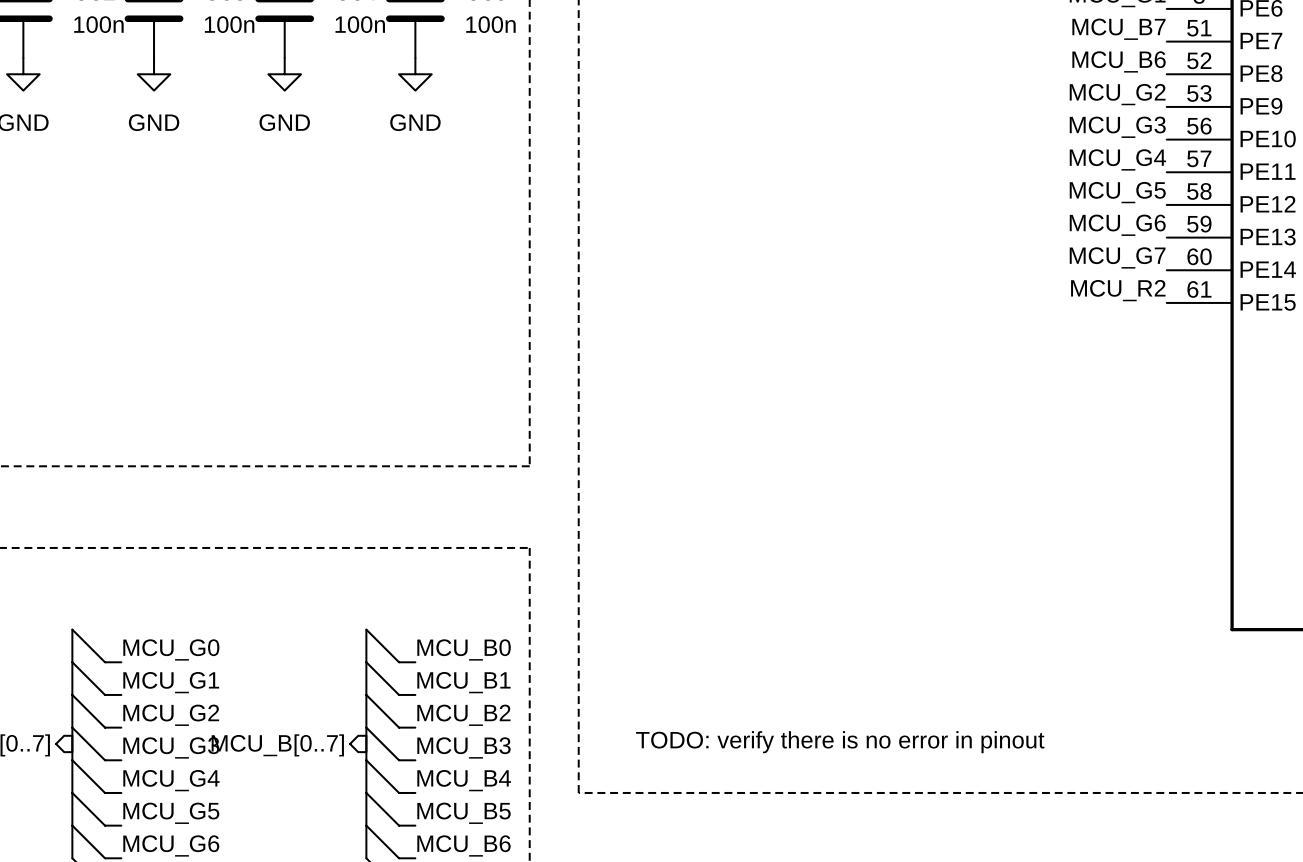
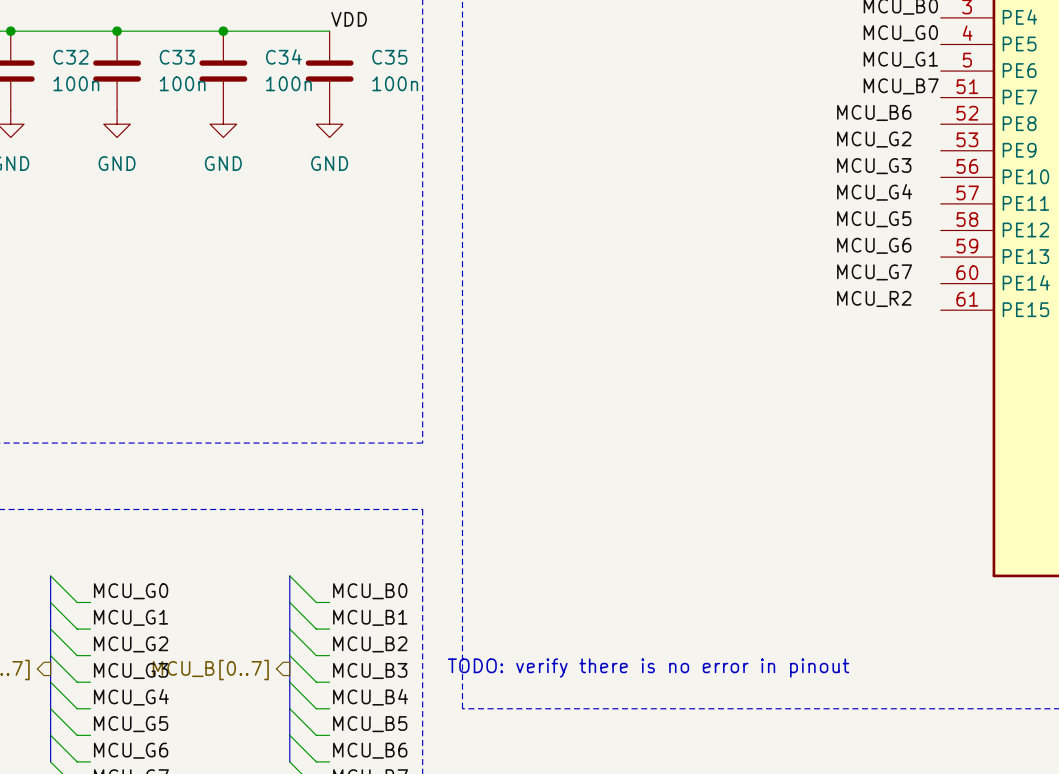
label position: MCU_B6 (1119, 61) -> MCU_B6 (874, 112)
label position: MCU_G2 (1117, 94) -> MCU_G2 (874, 139)
label position: MCU_G3 (1117, 127) -> MCU_G3 (874, 166)
label position: MCU_G4 (1117, 159) -> MCU_G4 (874, 192)
label position: MCU_G5 (1117, 192) -> MCU_G5 (874, 219)
label position: MCU_G6 (1117, 225) -> MCU_G6 (874, 245)
label position: MCU_G7 (1117, 257) -> MCU_G7 (874, 272)
label position: MCU_R2 (1118, 290) -> MCU_R2 (874, 298)
text position: TODO: verify there is no error in pinout (840, 742) -> TODO: verify there is no error in pinout (648, 668)

